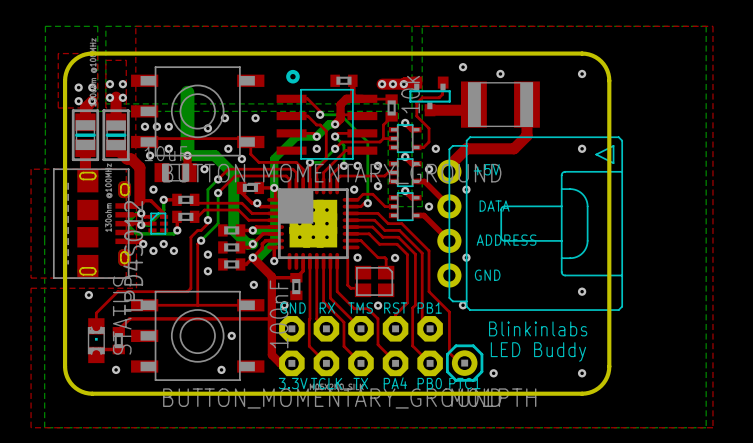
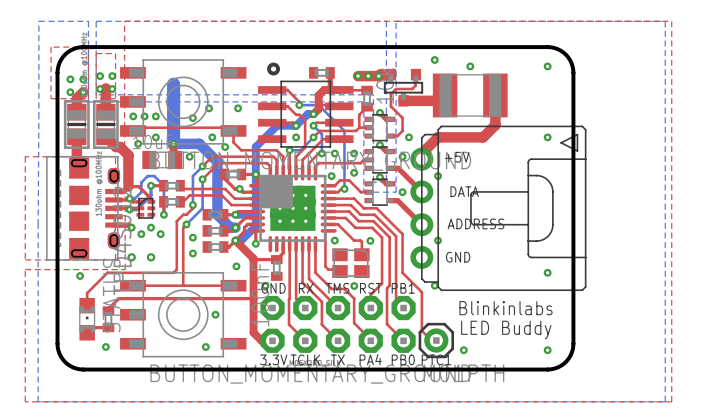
via: (153, 189) -> none
bottom track: (141, 213) (136, 213) (129, 220) (129, 227) (136, 233) (173, 233) (177, 230) -> (129, 198) (134, 198) (141, 192) (141, 182) (147, 176) (154, 176) (163, 185) (163, 214)
via: none -> (131, 257)
via: none -> (151, 257)

